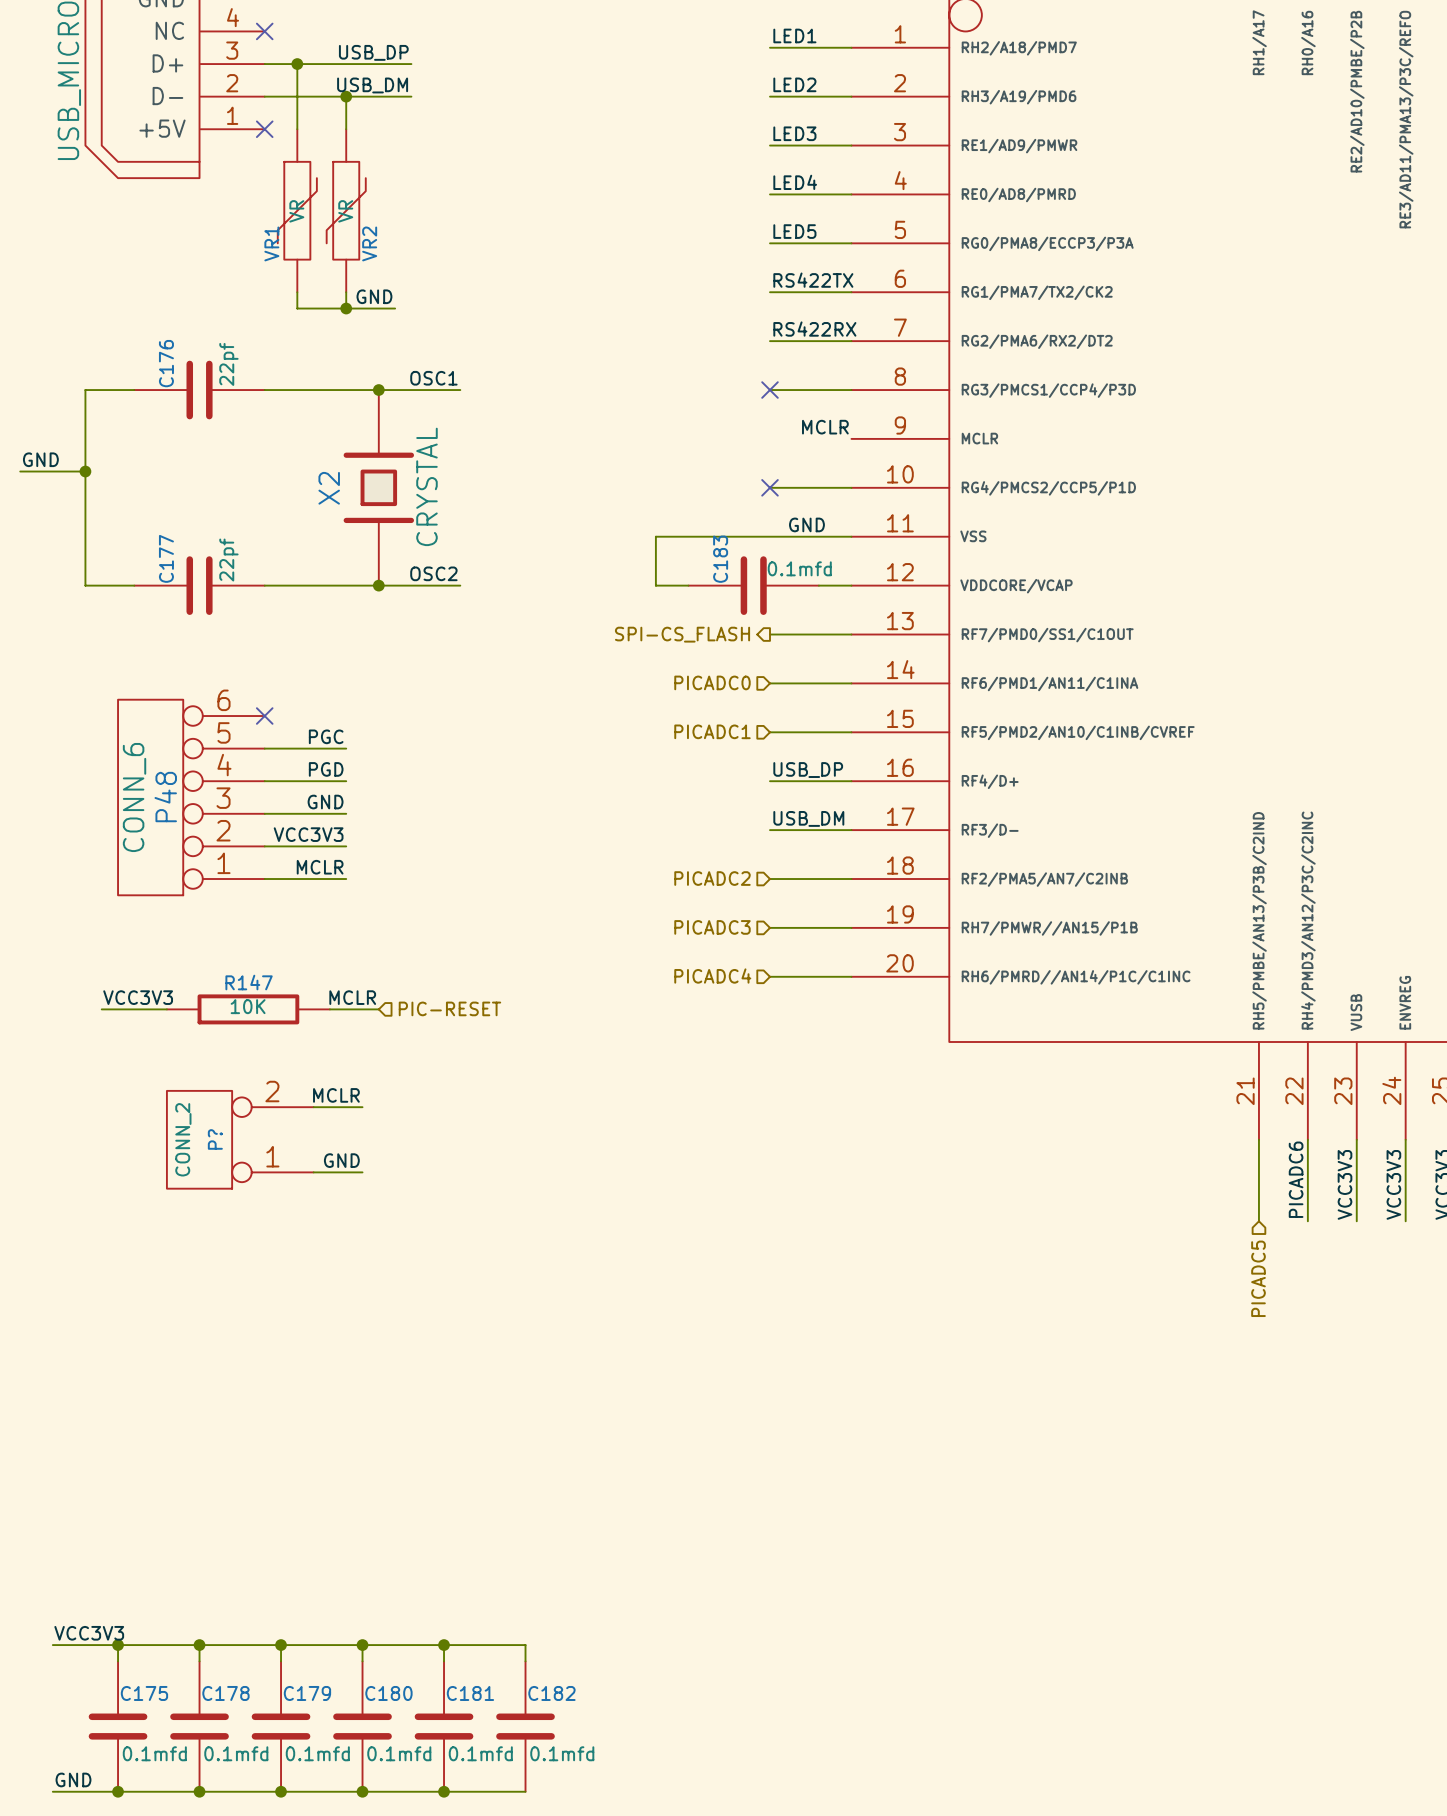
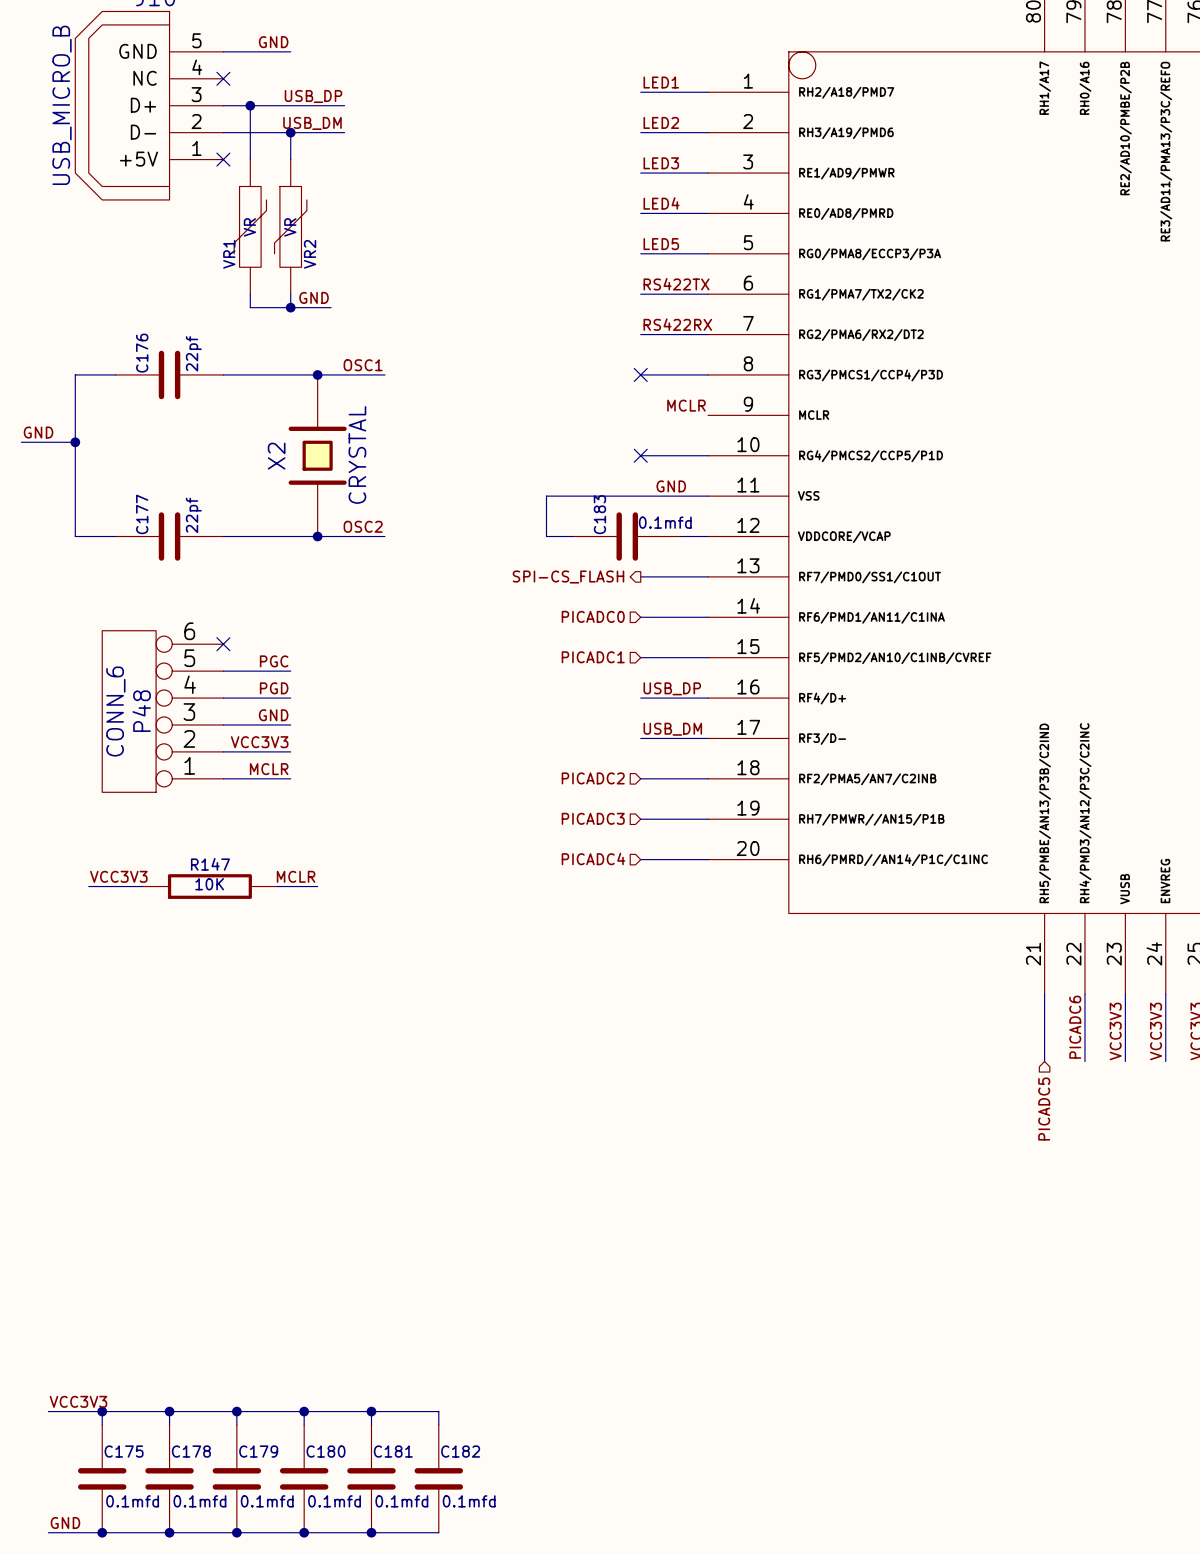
hierarchical label: PIC-RESET (449, 1008) -> none
label: MCLR (336, 1095) -> none
wire: (313, 1107) (362, 1107) -> none
P?: CONN_2 (240, 1139) -> none
label: GND (341, 1160) -> none
wire: (313, 1172) (362, 1172) -> none

